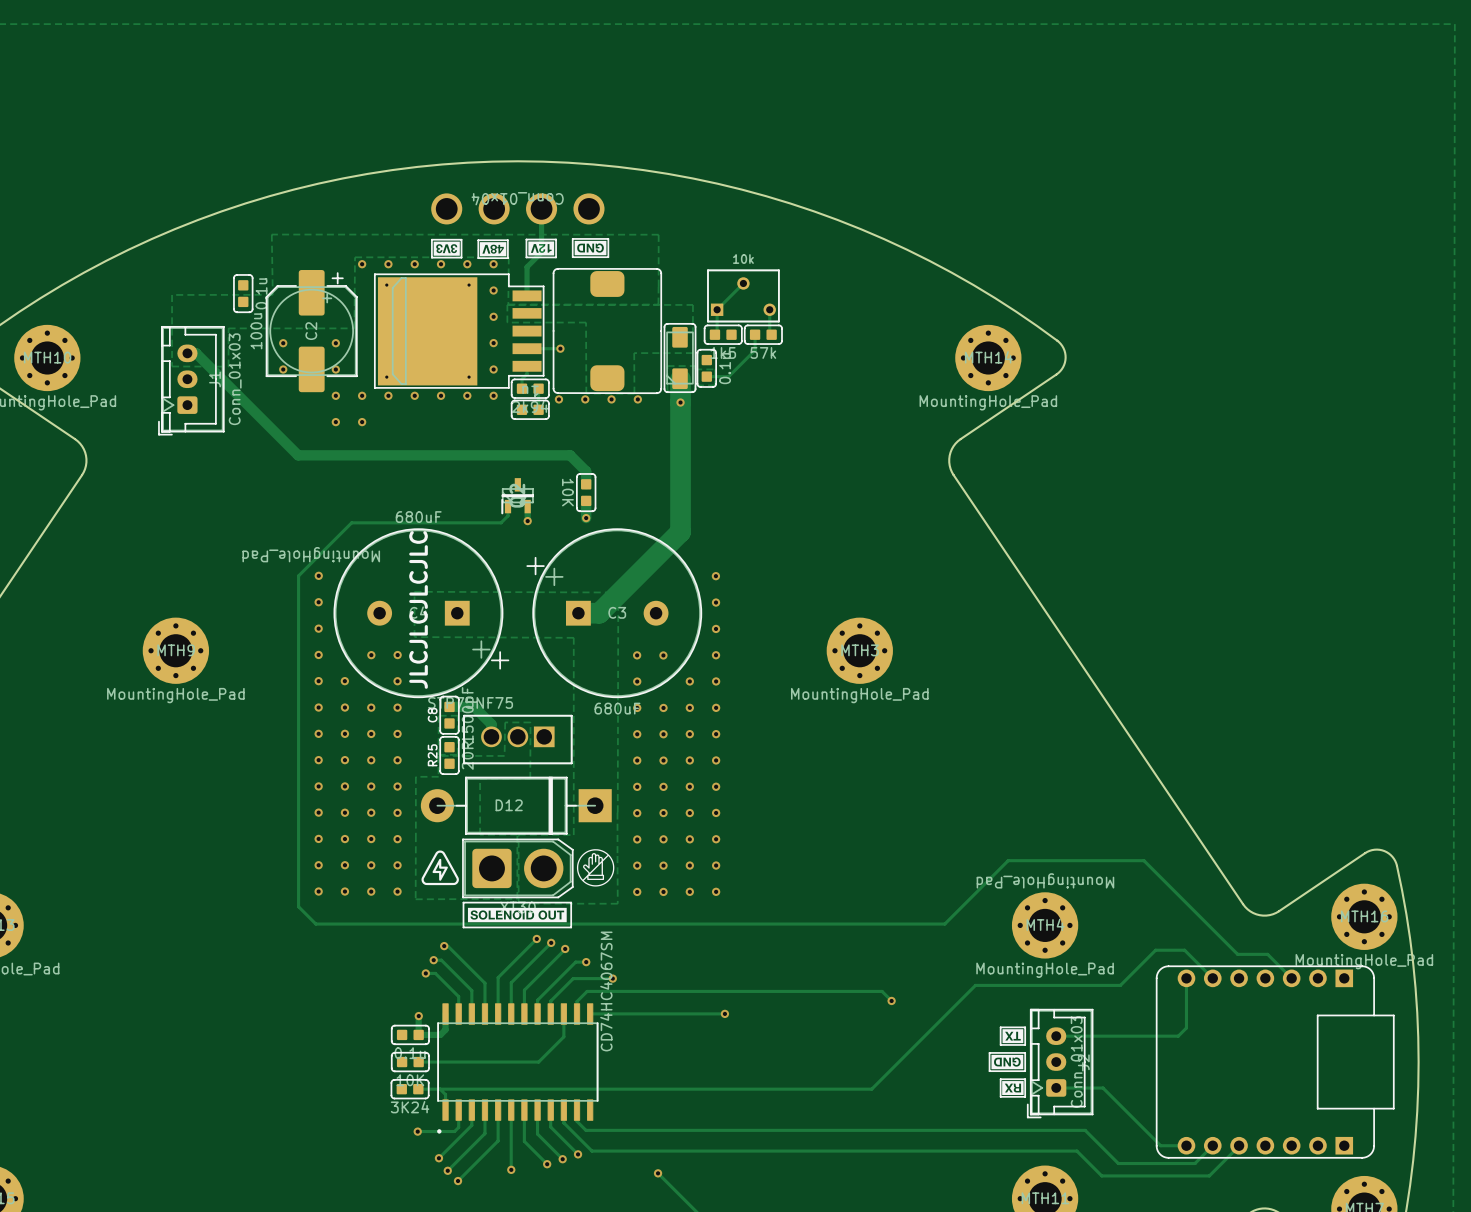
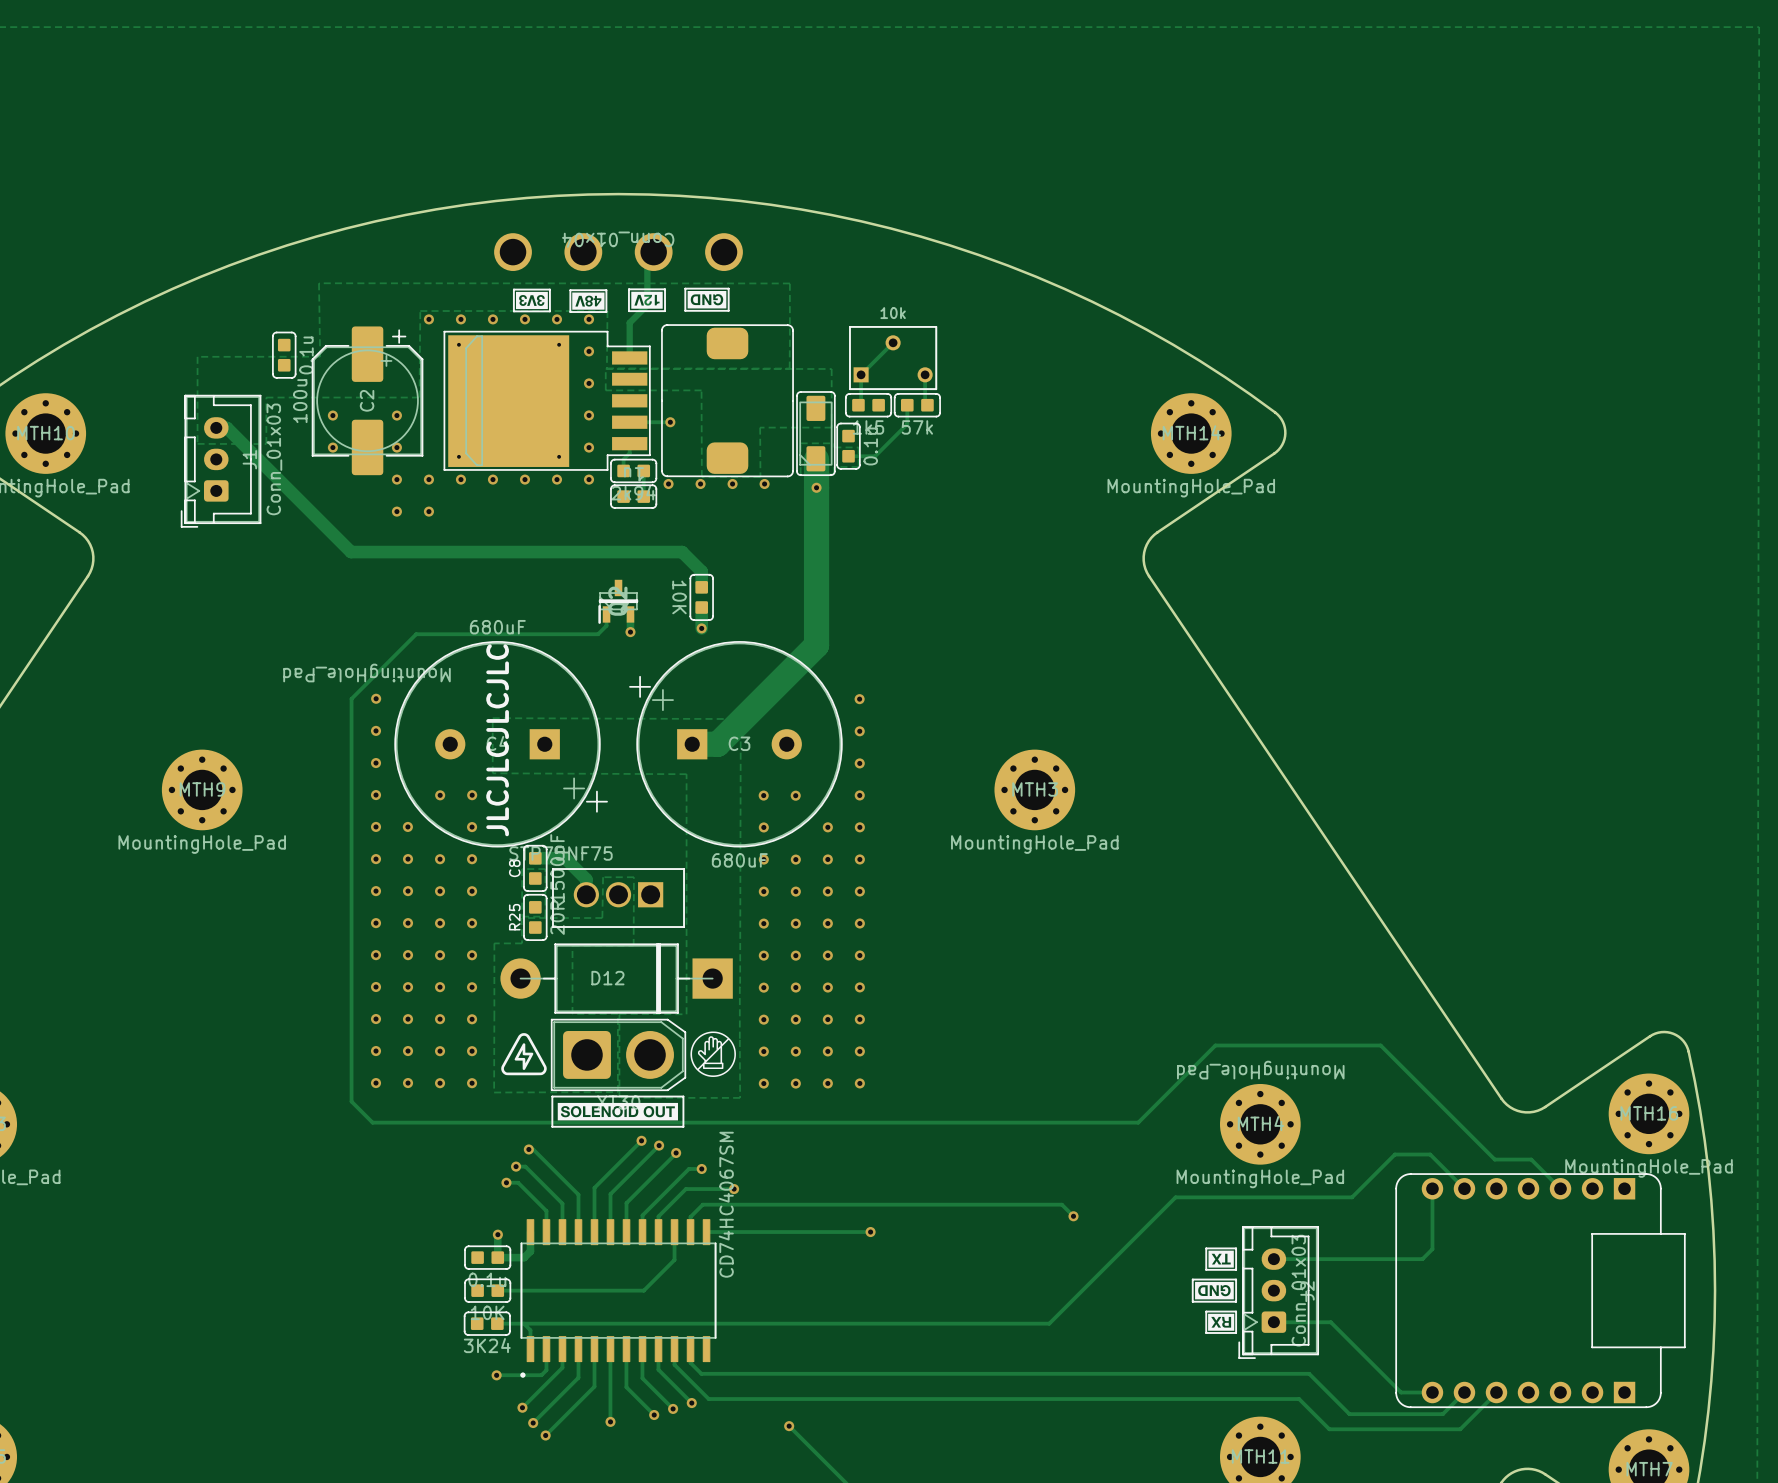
part footprint: [431, 193, 605, 225] -> [494, 233, 743, 271]

